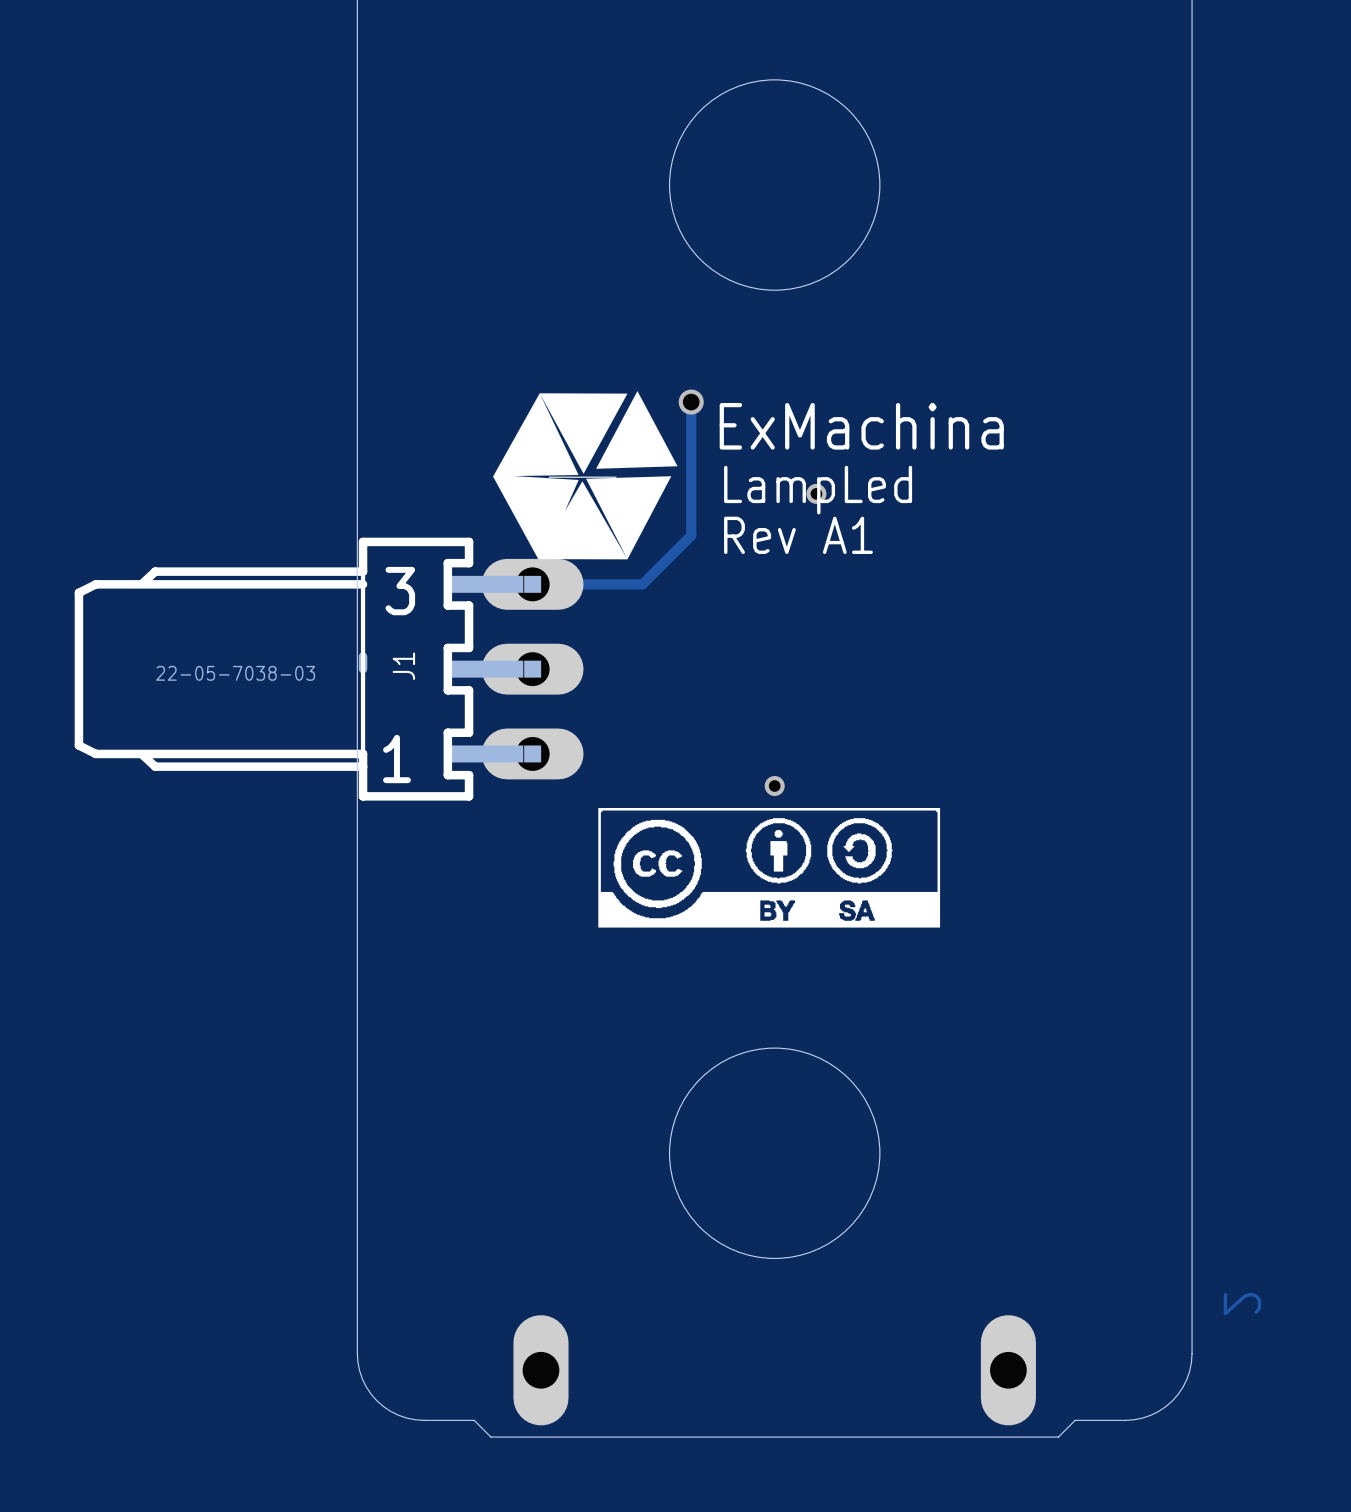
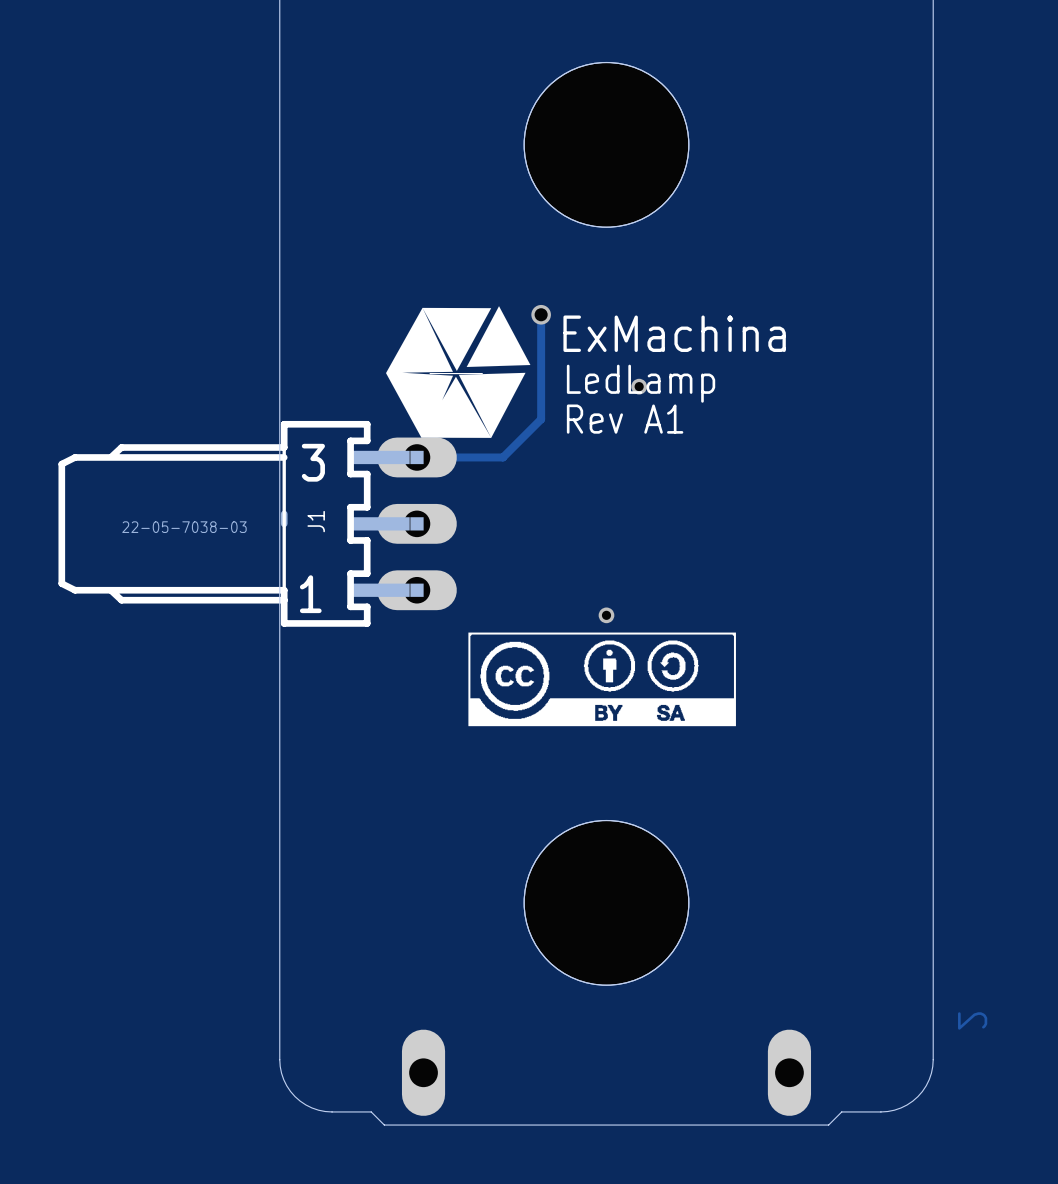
hole: none -> (606, 144)
text: LampLed (818, 490) -> LedLamp (641, 383)
hole: none -> (606, 902)

